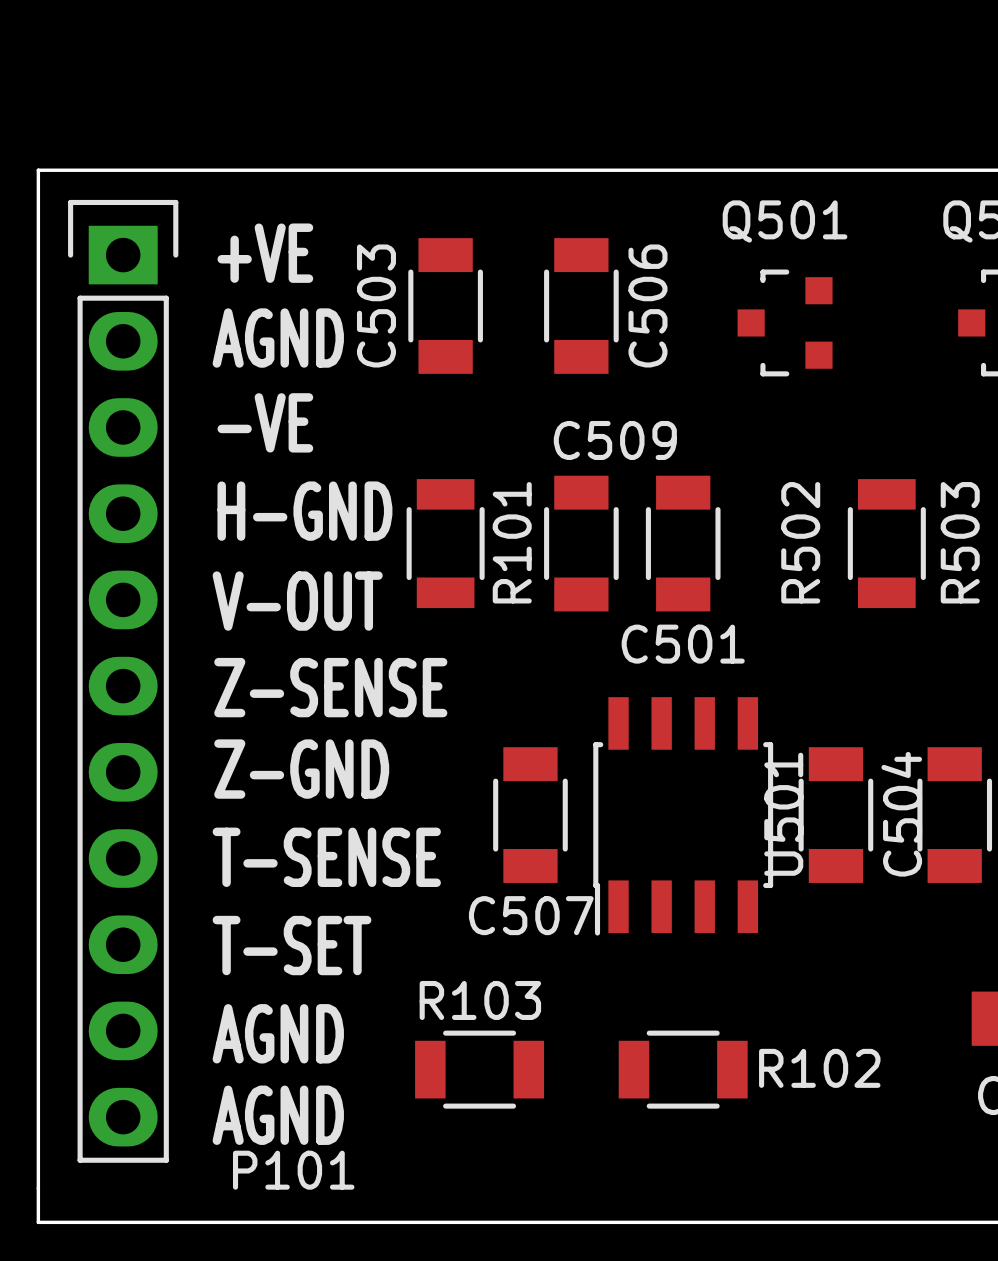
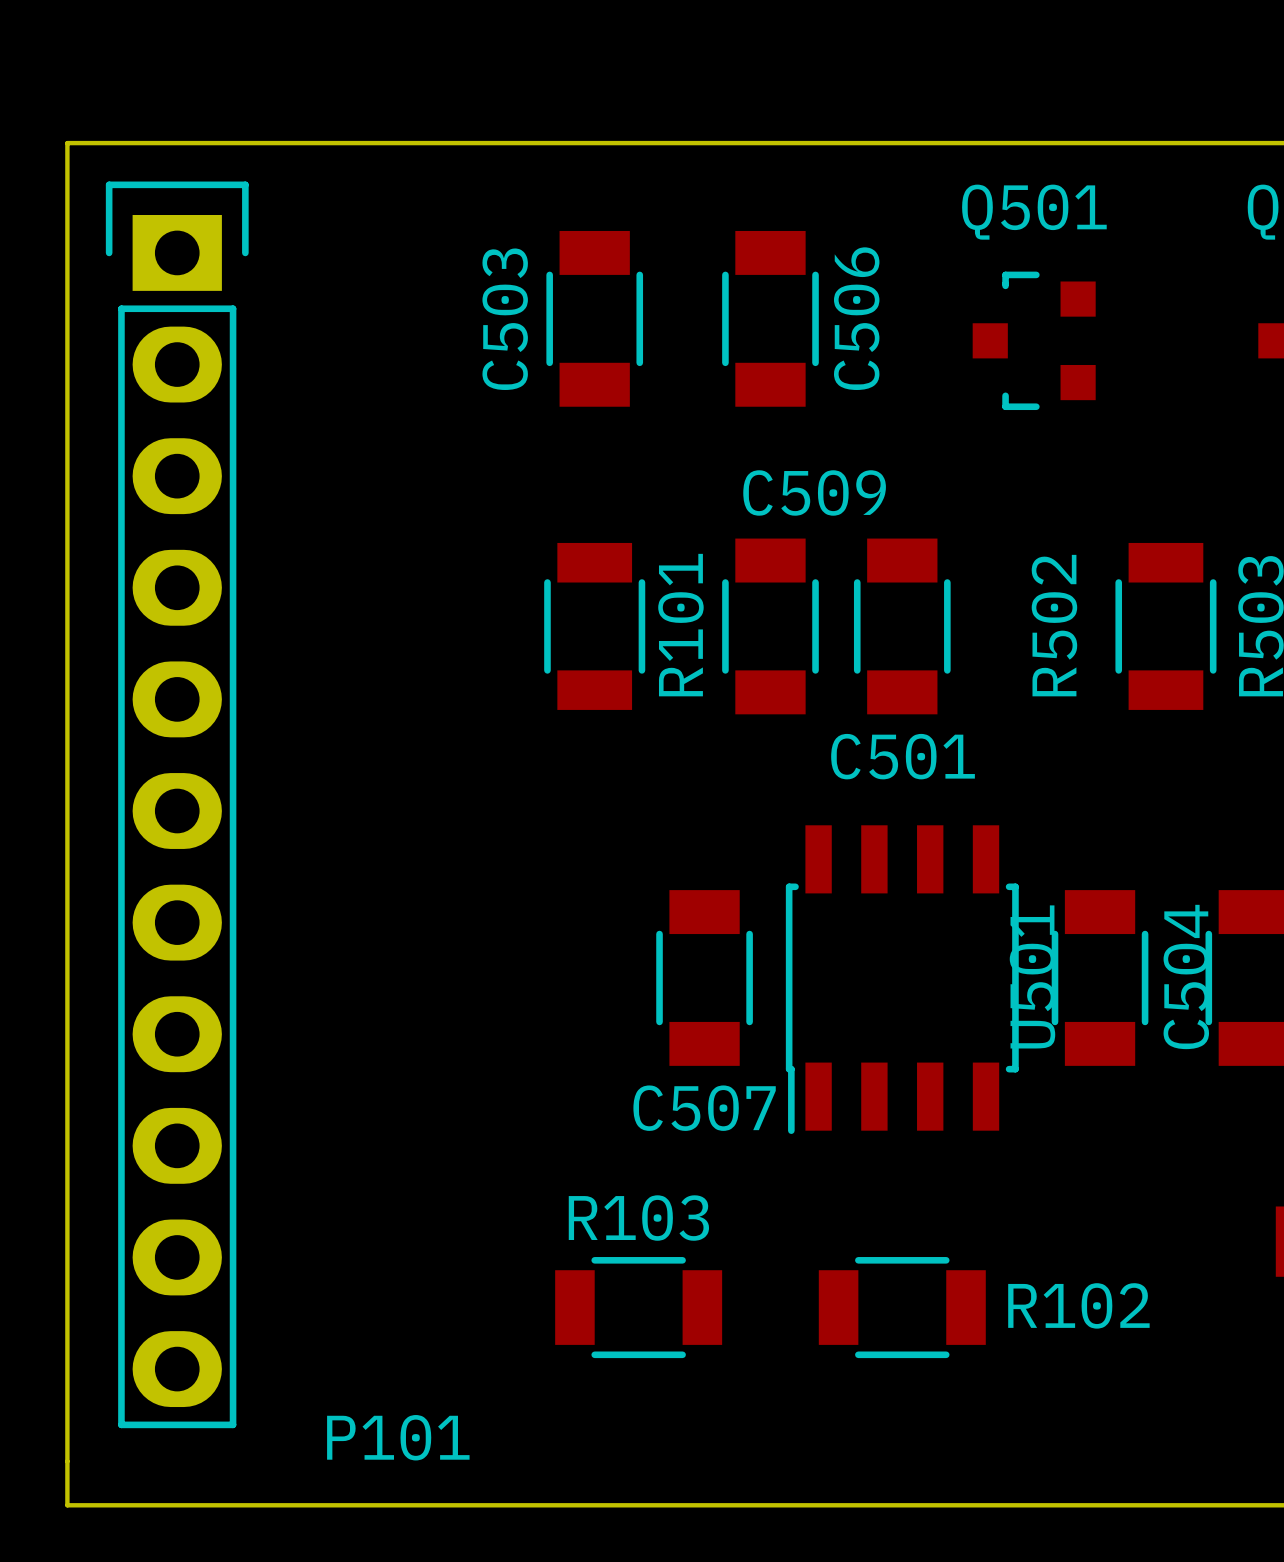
text: +VE (265, 253) -> none
text: AGND (278, 338) -> none
text: -VE (265, 422) -> none
text: H-GND (304, 511) -> none
text: V-OUT (297, 601) -> none
text: Z-SENSE (330, 687) -> none
text: Z-GND (301, 769) -> none
text: T-SENSE (326, 857) -> none
text: T-SET (292, 945) -> none
text: AGND (278, 1033) -> none
text: AGND (278, 1115) -> none

